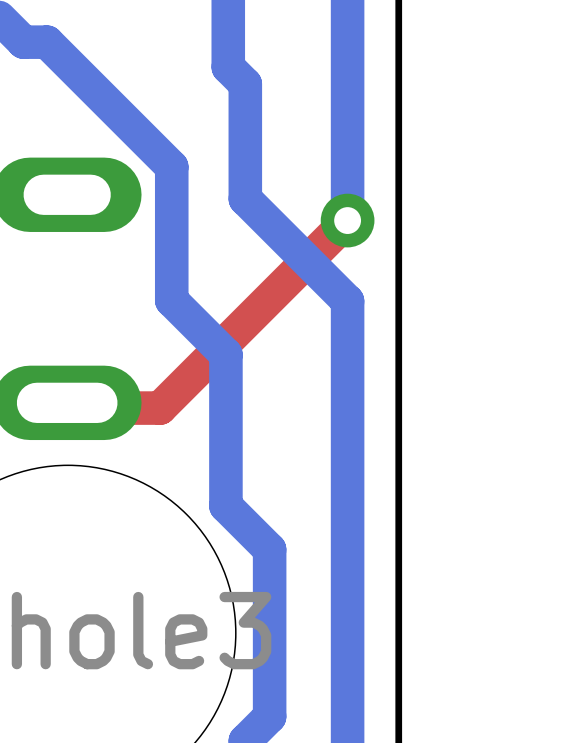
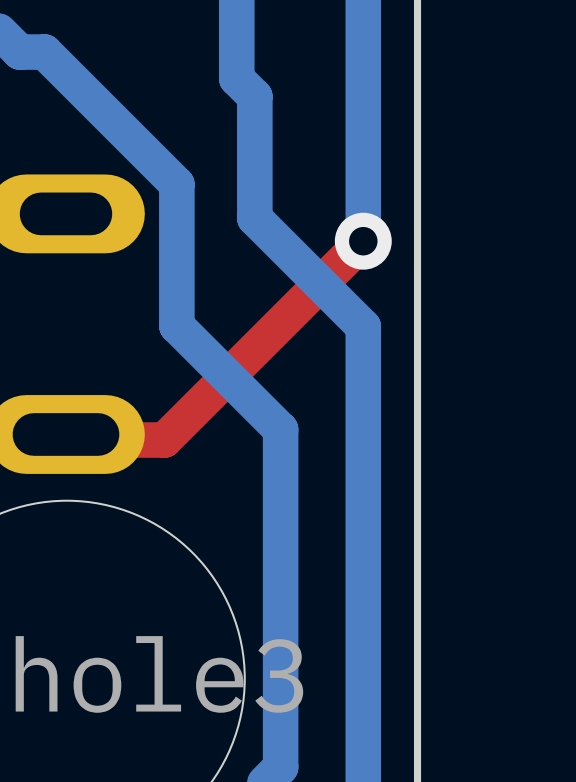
bottom track: (225, 354) (225, 505) (269, 549) -> (234, 383) (280, 429) (280, 590)

